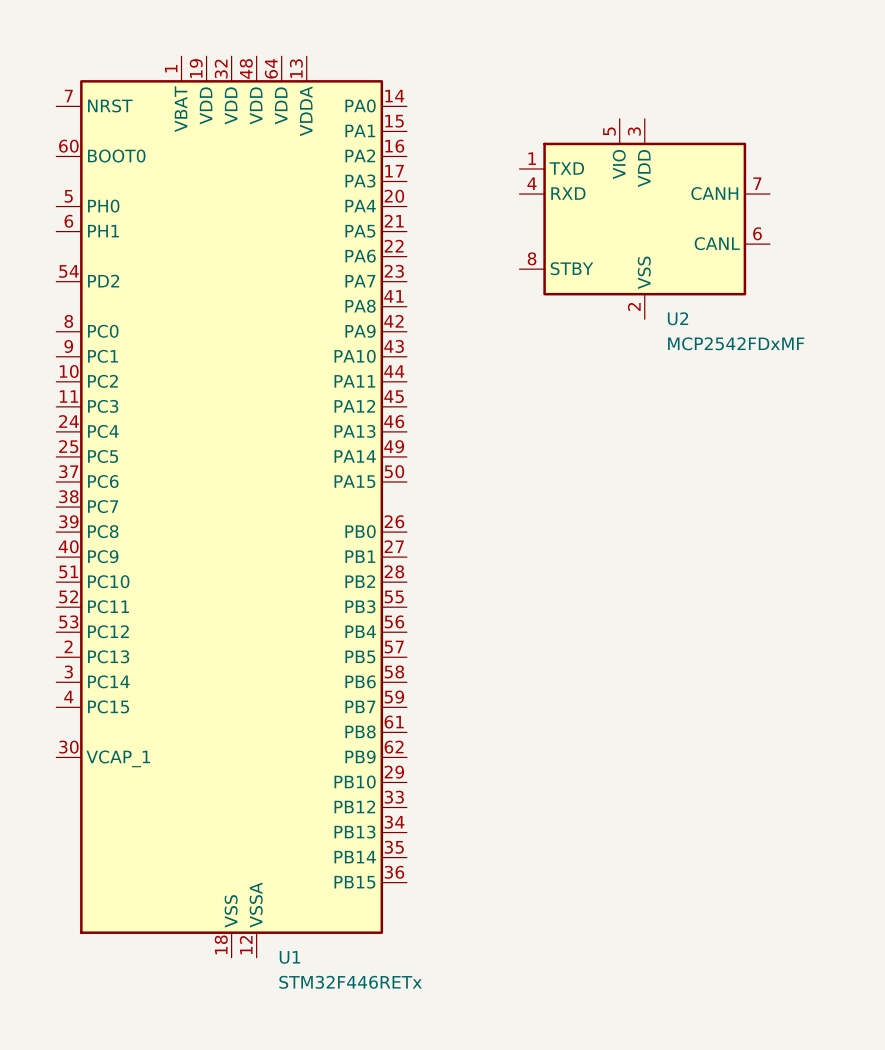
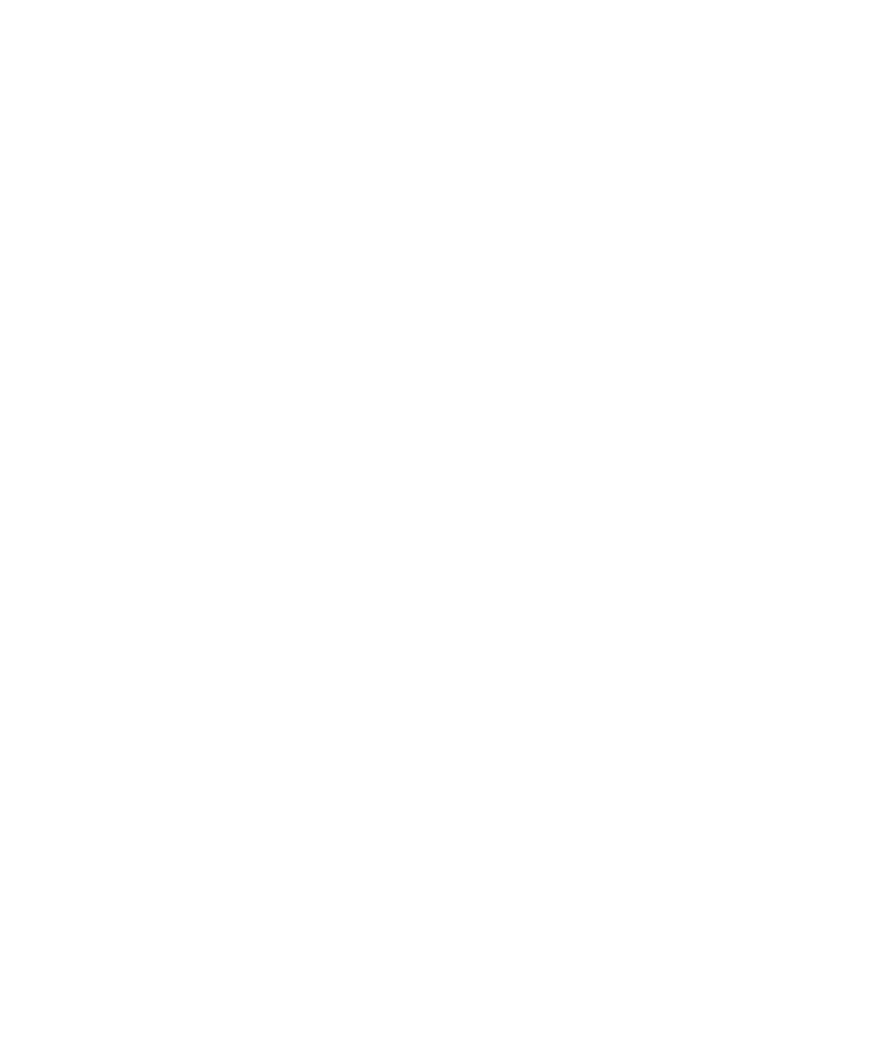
U2: MCP2542FDxMF (644, 219) -> none
U1: STM32F446RETx (231, 507) -> none

